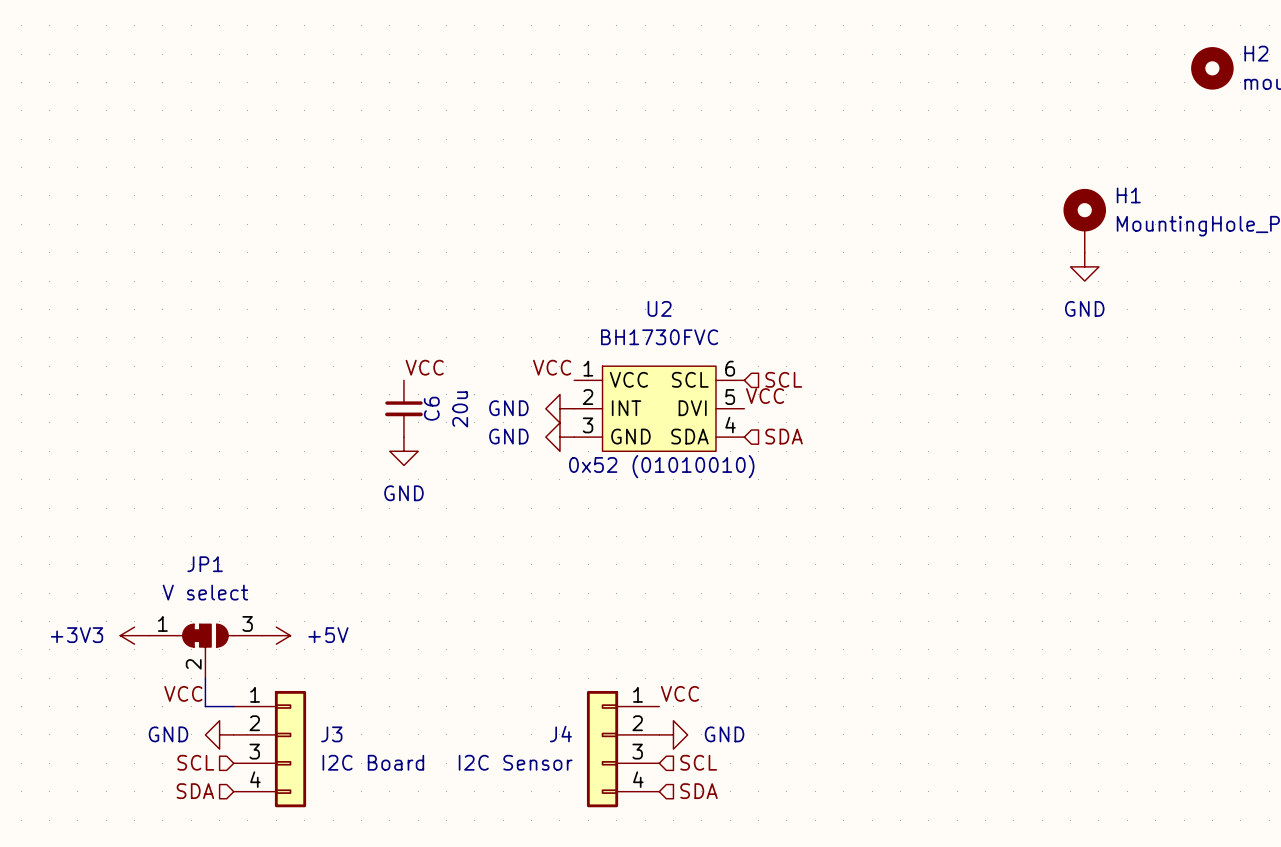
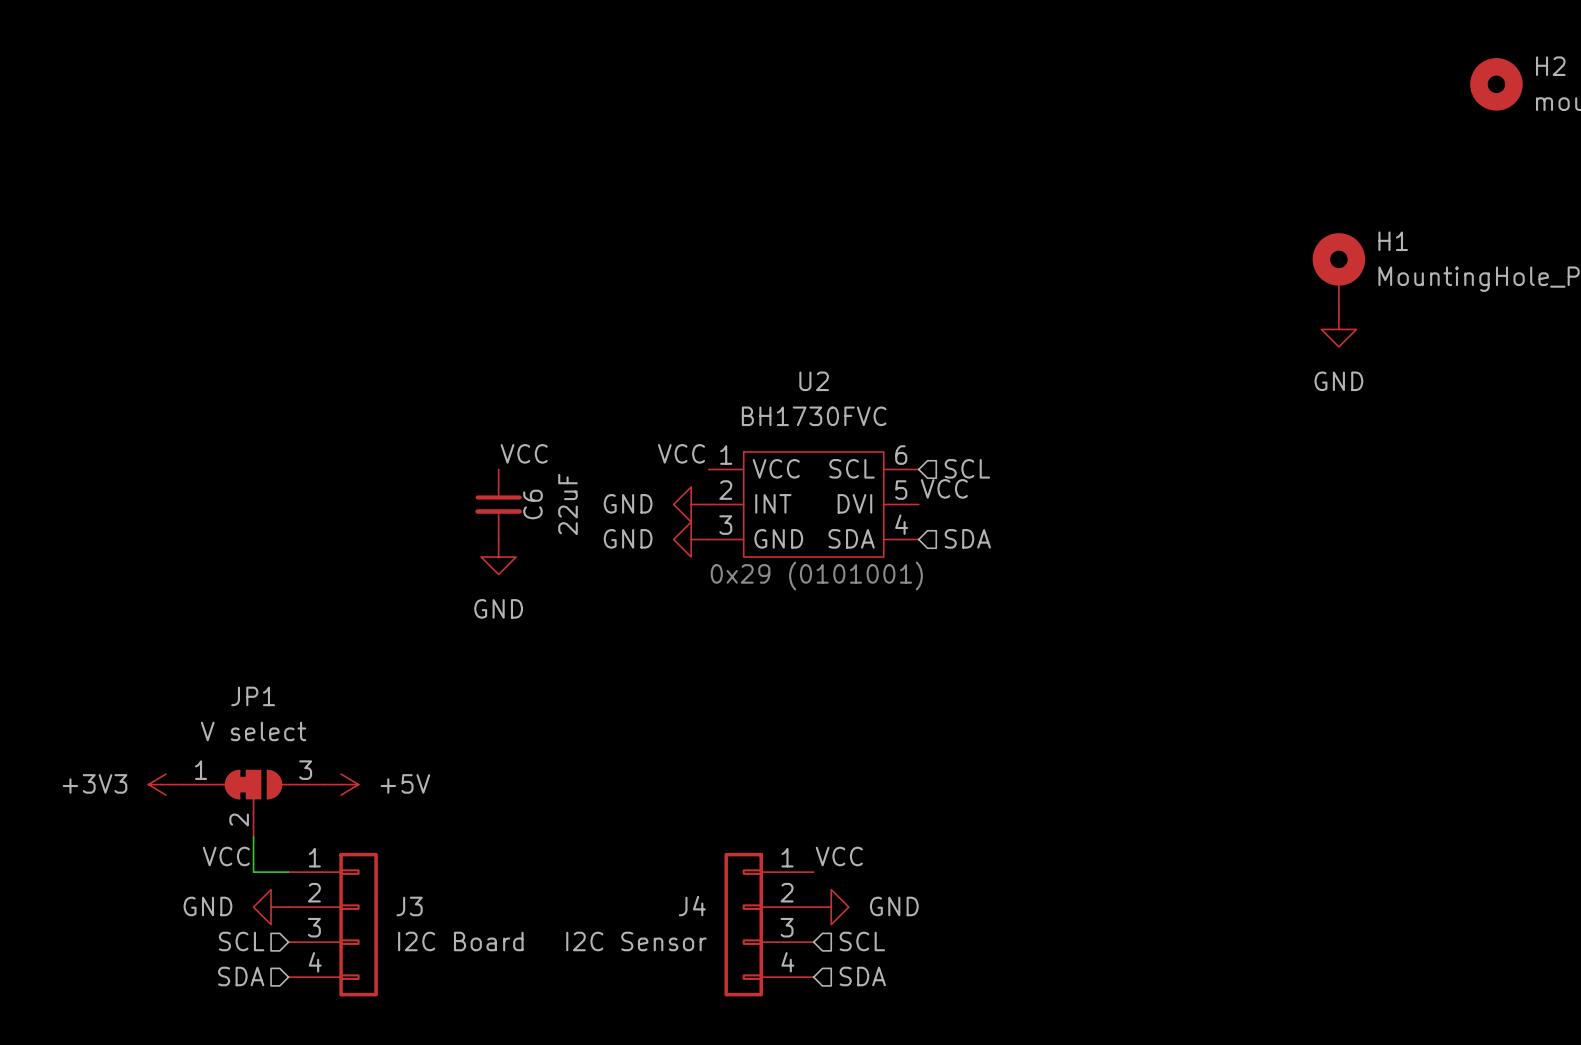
C6 value: 20u (460, 409) -> 22uF (567, 504)
text: 0x52 (01010010) (661, 466) -> 0x29 (0101001) (816, 576)

